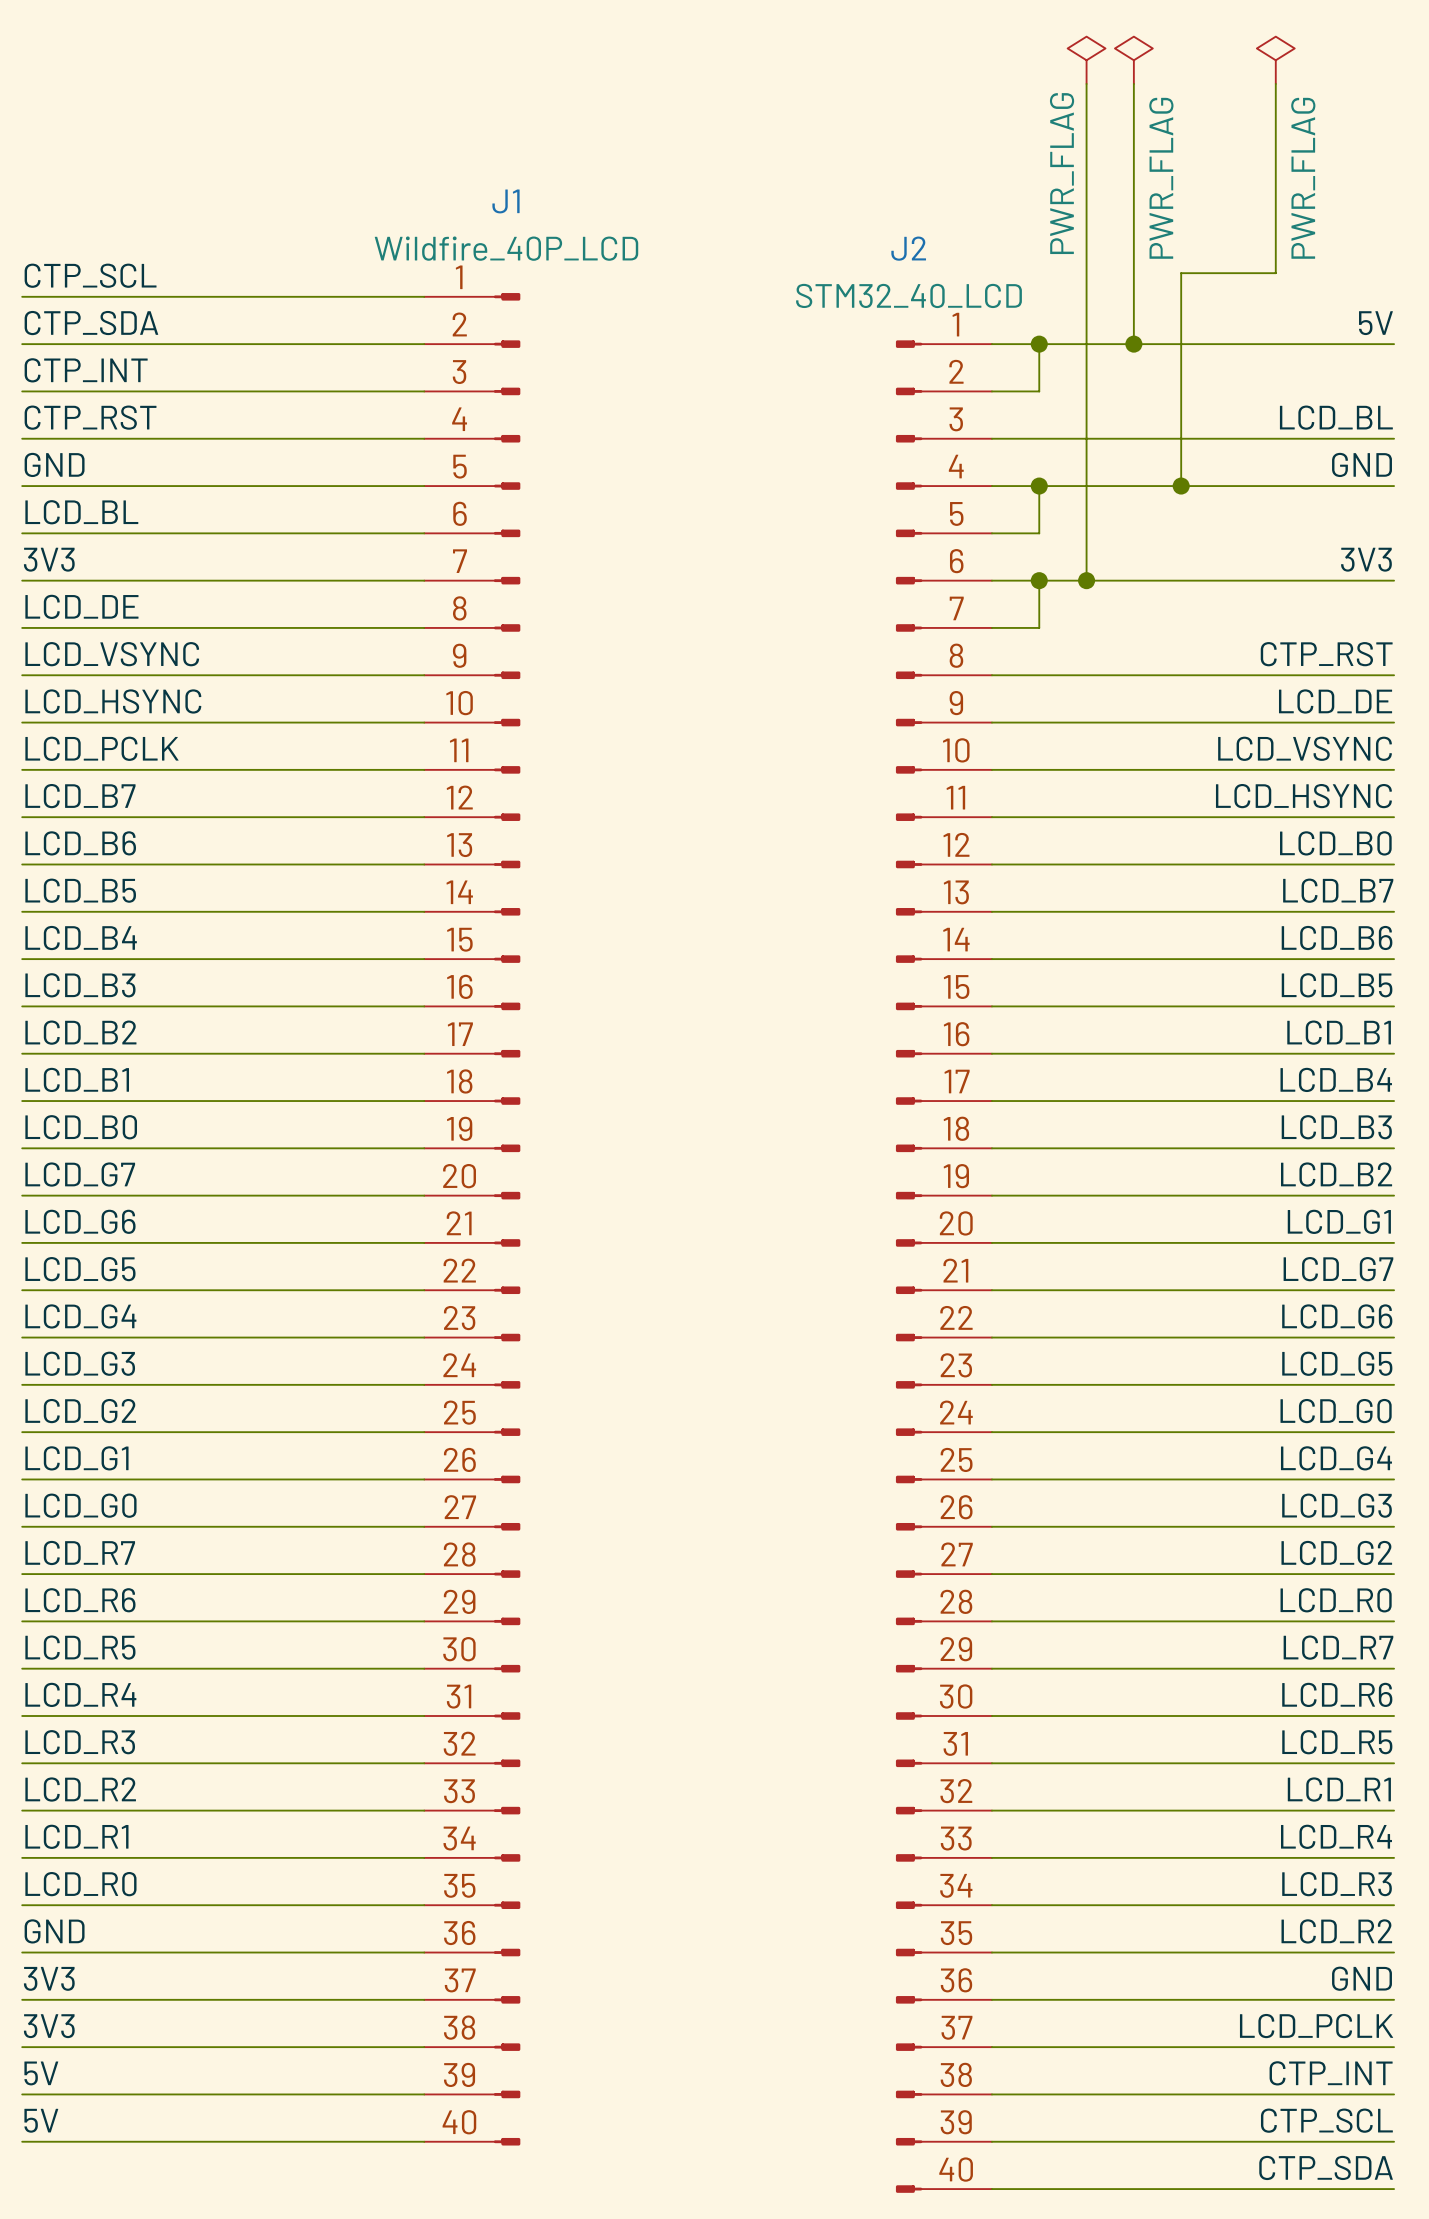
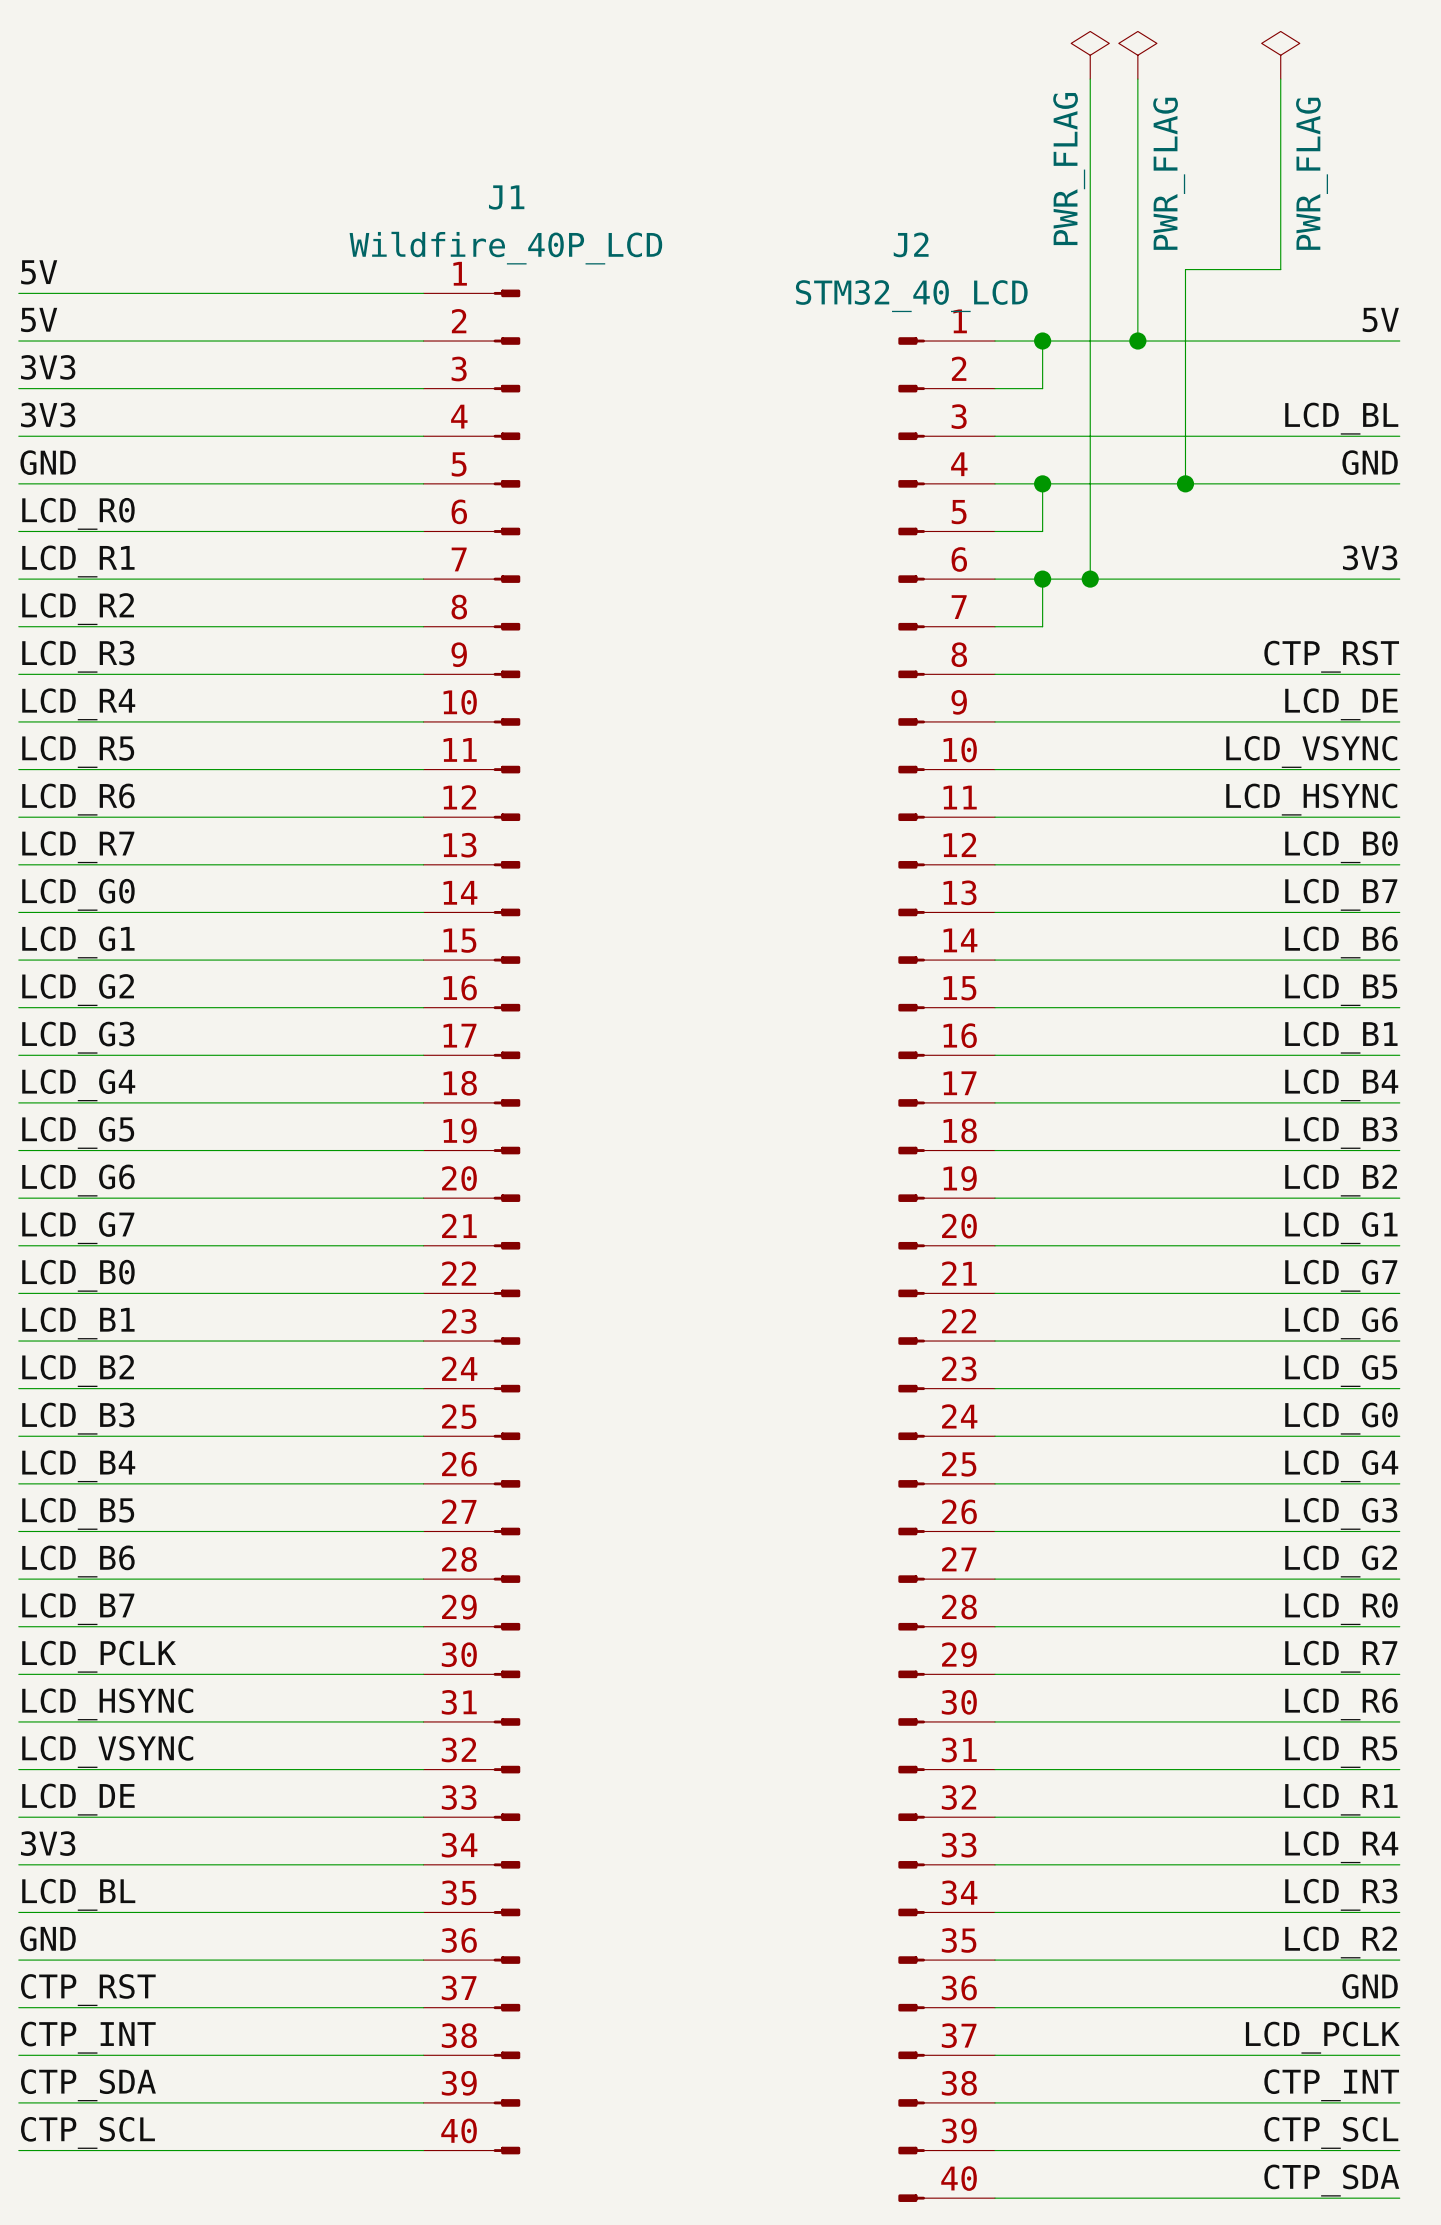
label: CTP_SCL (90, 275) -> 5V (39, 272)
label: CTP_SDA (91, 323) -> 5V (39, 319)
label: CTP_INT (86, 370) -> 3V3 (48, 367)
label: CTP_RST (90, 417) -> 3V3 (48, 415)
label: LCD_BL (81, 512) -> LCD_R0 (78, 513)
label: 3V3 (49, 559) -> LCD_R1 (78, 561)
label: LCD_DE (81, 606) -> LCD_R2 (78, 609)
label: LCD_VSYNC (112, 654) -> LCD_R3 (78, 656)
label: LCD_HSYNC (113, 701) -> LCD_R4 (78, 704)
label: LCD_PCLK (101, 748) -> LCD_R5 (78, 751)
label: LCD_B7 (80, 796) -> LCD_R6 (78, 799)
label: LCD_B6 (80, 843) -> LCD_R7 (78, 847)
label: LCD_B5 (80, 890) -> LCD_G0 (78, 894)
label: LCD_B4 (81, 938) -> LCD_G1 (78, 942)
label: LCD_B3 (80, 985) -> LCD_G2 (78, 990)
label: LCD_B2 (80, 1032) -> LCD_G3 (78, 1037)
label: LCD_B1 (77, 1079) -> LCD_G4 (78, 1085)
label: LCD_B0 (81, 1127) -> LCD_G5 (78, 1132)
label: LCD_G7 (80, 1174) -> LCD_G6 (78, 1180)
label: LCD_G6 (80, 1221) -> LCD_G7 (78, 1228)
label: LCD_G5 (80, 1269) -> LCD_B0 (78, 1275)
label: LCD_G4 (80, 1316) -> LCD_B1 (78, 1323)
label: LCD_G3 (80, 1363) -> LCD_B2 (78, 1371)
label: LCD_G2 (80, 1411) -> LCD_B3 (78, 1418)
label: LCD_G1 (76, 1458) -> LCD_B4 (78, 1466)
label: LCD_G0 (80, 1505) -> LCD_B5 (78, 1513)
label: LCD_R7 (80, 1552) -> LCD_B6 (78, 1561)
label: LCD_R6 (80, 1600) -> LCD_B7 (78, 1609)
label: LCD_R5 (80, 1647) -> LCD_PCLK (99, 1656)
label: LCD_R4 (80, 1694) -> LCD_HSYNC (107, 1704)
label: LCD_R3 (80, 1742) -> LCD_VSYNC (107, 1751)
label: LCD_R2 (80, 1789) -> LCD_DE (78, 1799)
label: LCD_R1 (76, 1836) -> 3V3 (48, 1843)
label: LCD_R0 (80, 1884) -> LCD_BL (78, 1894)
label: 3V3 (49, 1978) -> CTP_RST (88, 1990)
label: 3V3 (49, 2026) -> CTP_INT (88, 2037)
label: 5V (41, 2073) -> CTP_SDA (88, 2085)
label: 5V (41, 2120) -> CTP_SCL (87, 2132)

